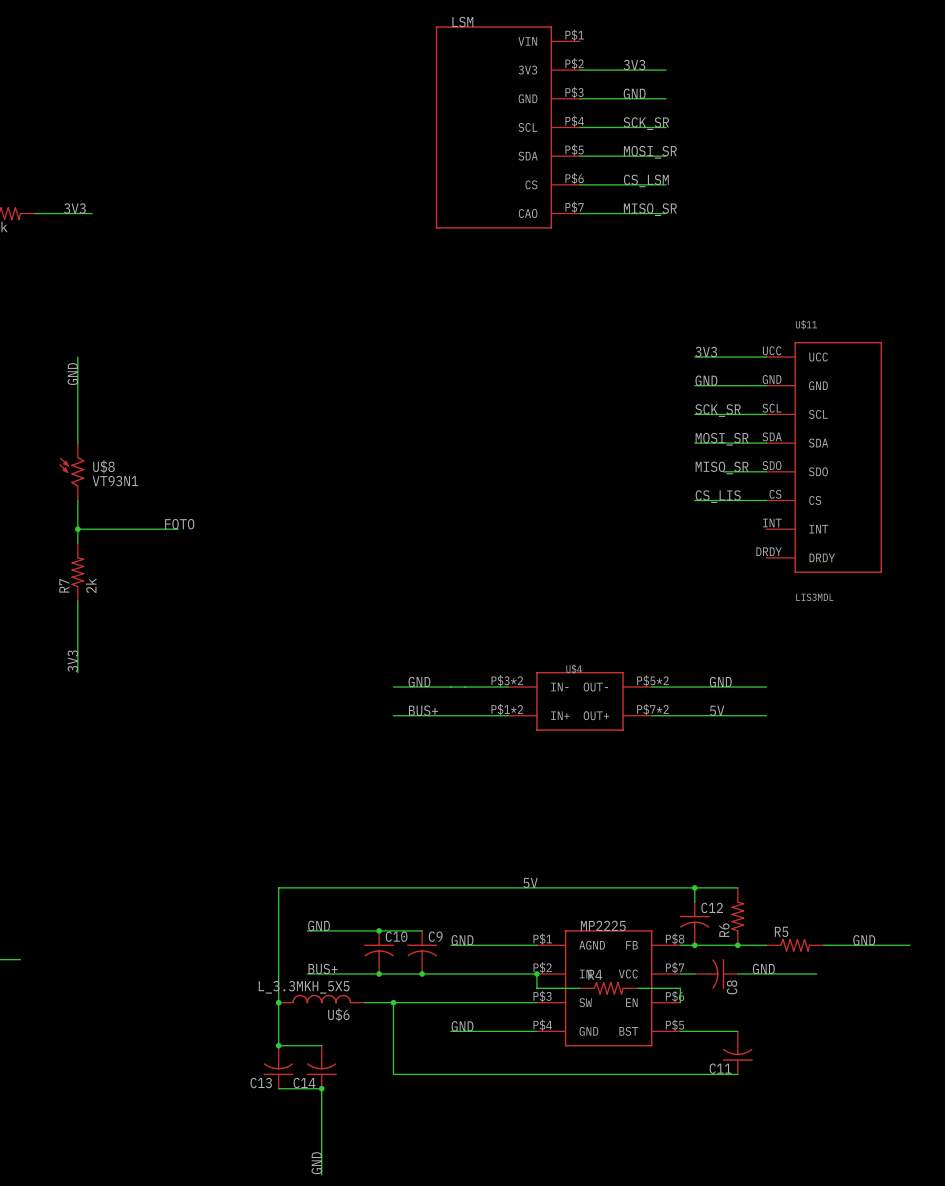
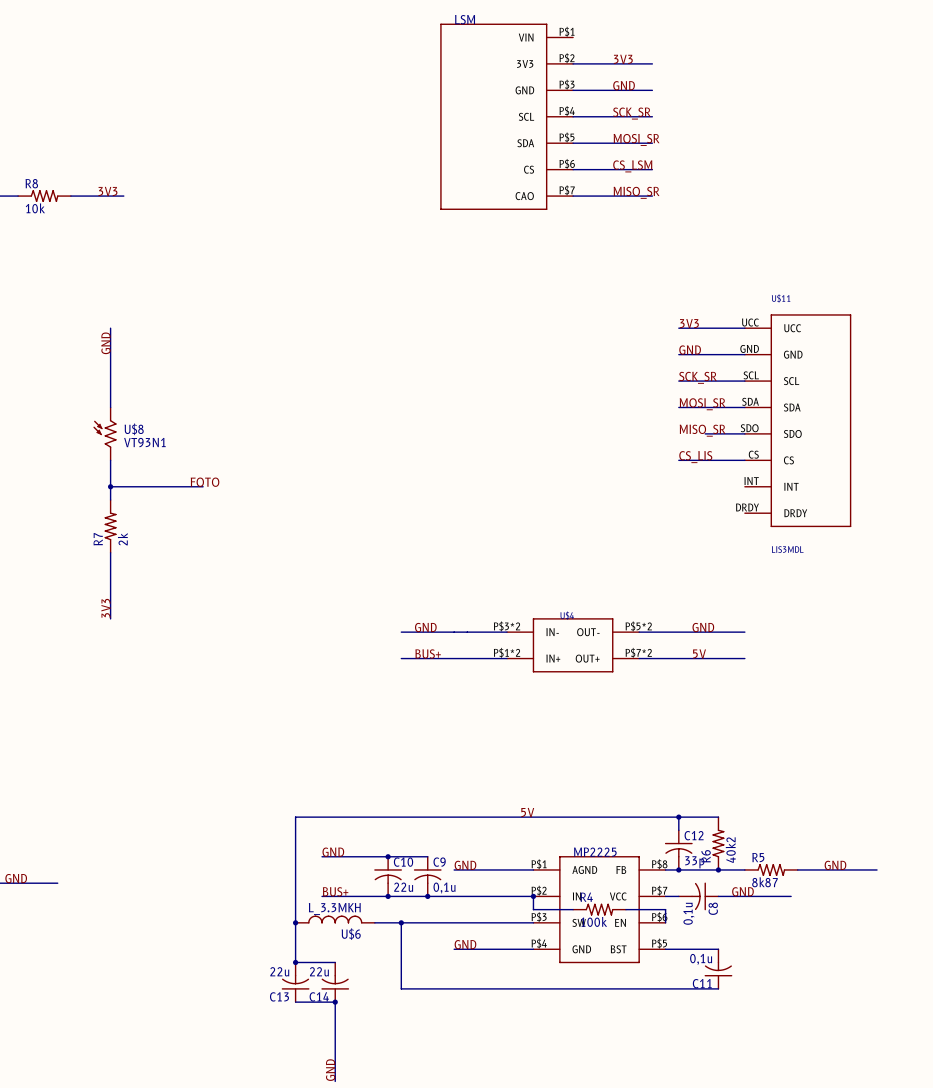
R6 value: none -> 40k2 (730, 850)
C12 value: none -> 33p (694, 862)
R5 value: none -> 8k87 (764, 882)
C10 value: none -> 22u (403, 887)
C9 value: none -> 0,1u (444, 888)
U$6 value: L_3.3MKH_5X5 (304, 987) -> L_3.3MKH (334, 909)
C8 value: none -> 0,1u (688, 913)
R4 value: none -> 100k (593, 921)
C11 value: none -> 0,1u (701, 959)
C13 value: none -> 22u (279, 971)
C14 value: none -> 22u (319, 971)

